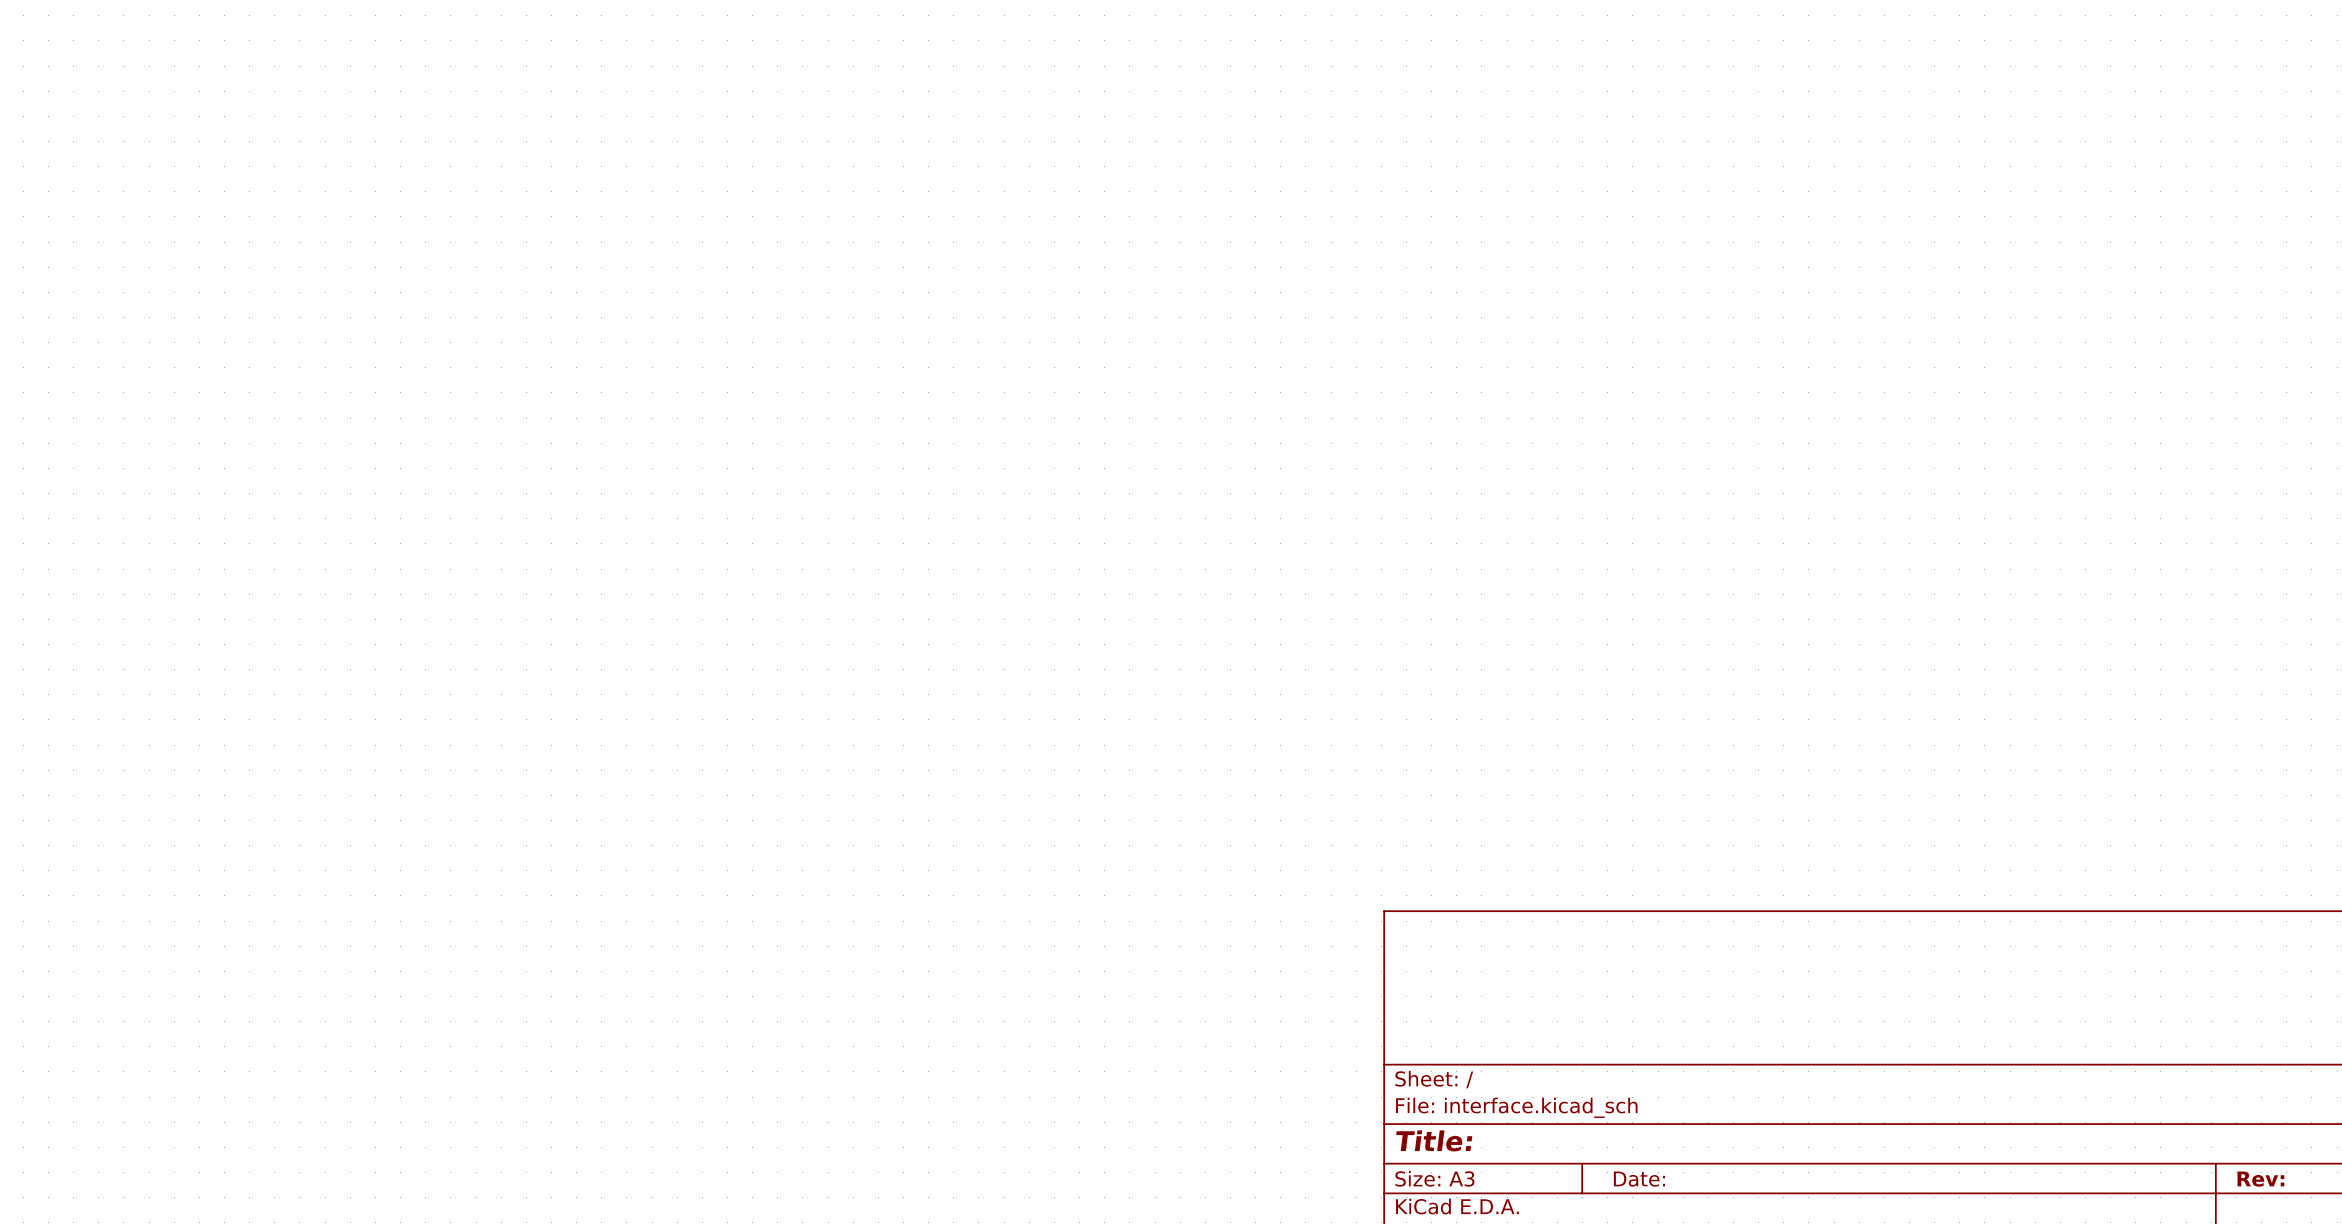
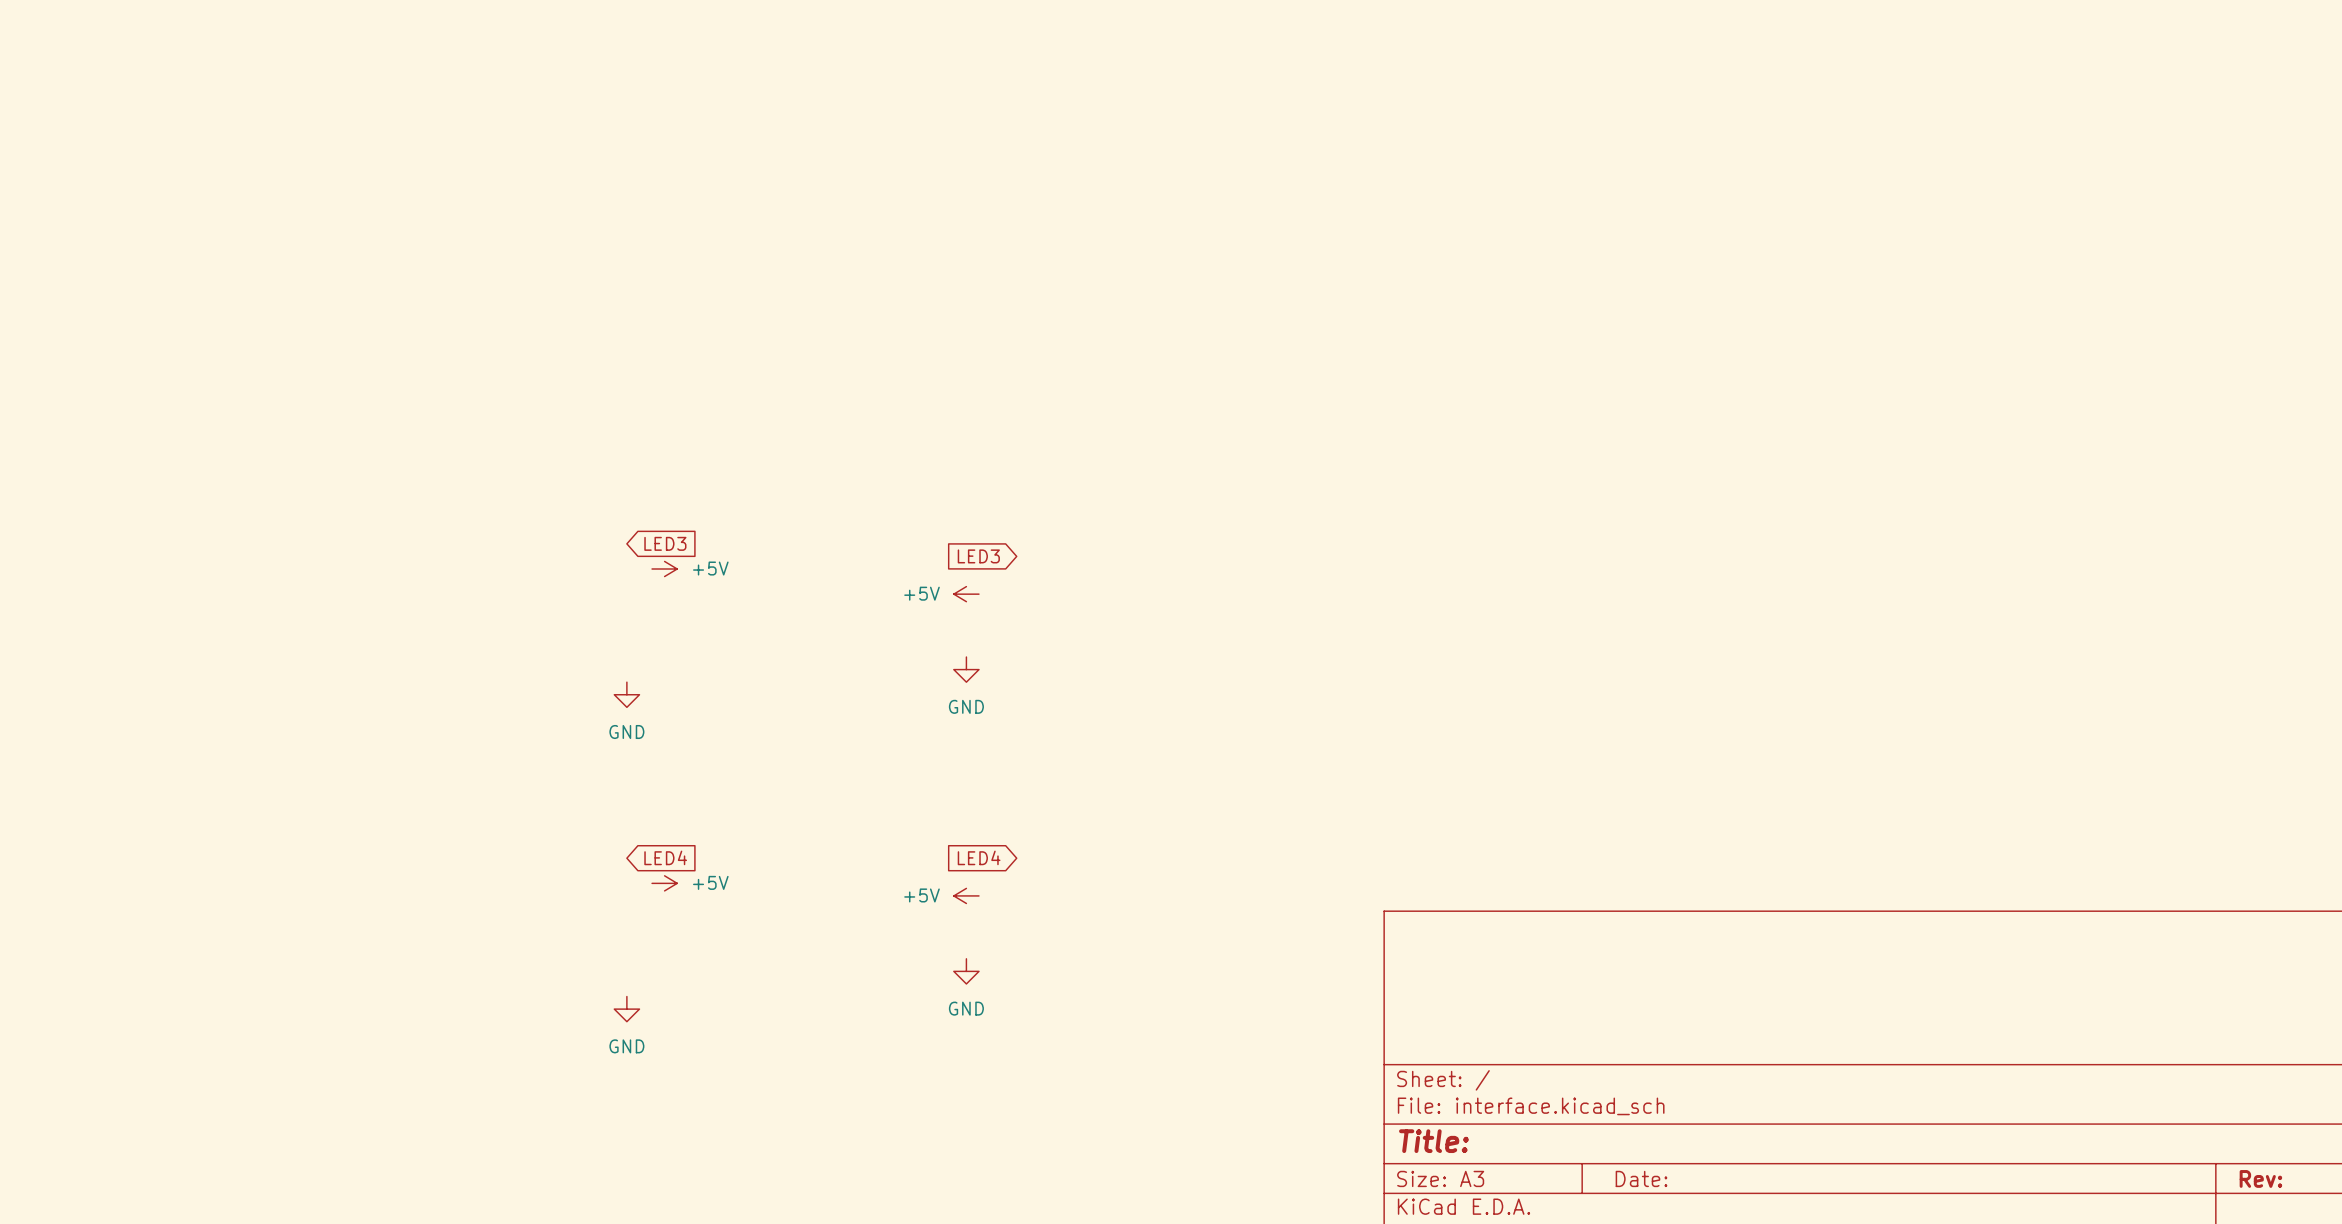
global label: none -> LED3 (665, 543)
global label: none -> LED3 (978, 556)
power symbol: none -> +5V (664, 569)
power symbol: none -> +5V (966, 594)
power symbol: none -> GND (966, 669)
power symbol: none -> GND (626, 694)
global label: none -> LED4 (665, 857)
global label: none -> LED4 (979, 857)
power symbol: none -> +5V (664, 883)
power symbol: none -> +5V (966, 895)
power symbol: none -> GND (966, 971)
power symbol: none -> GND (626, 1009)

